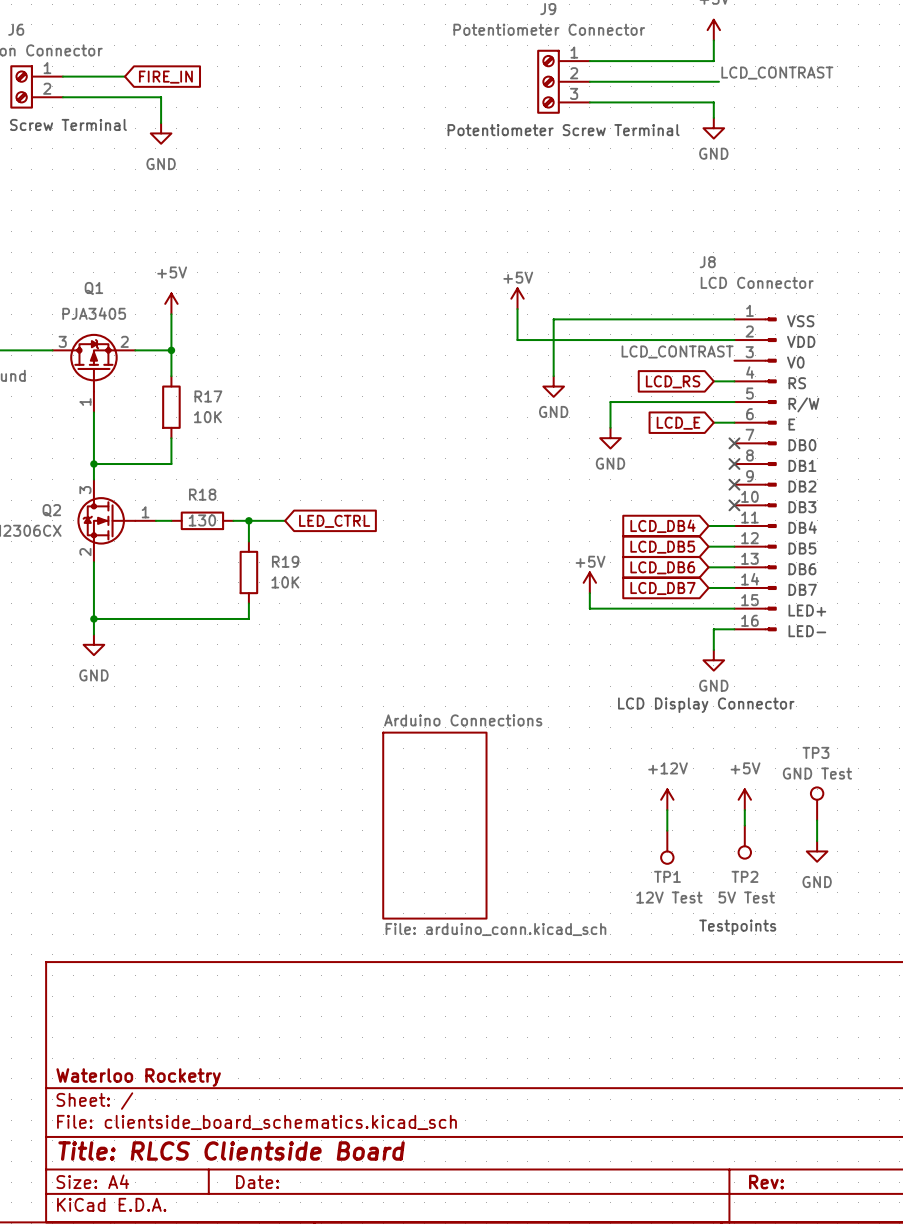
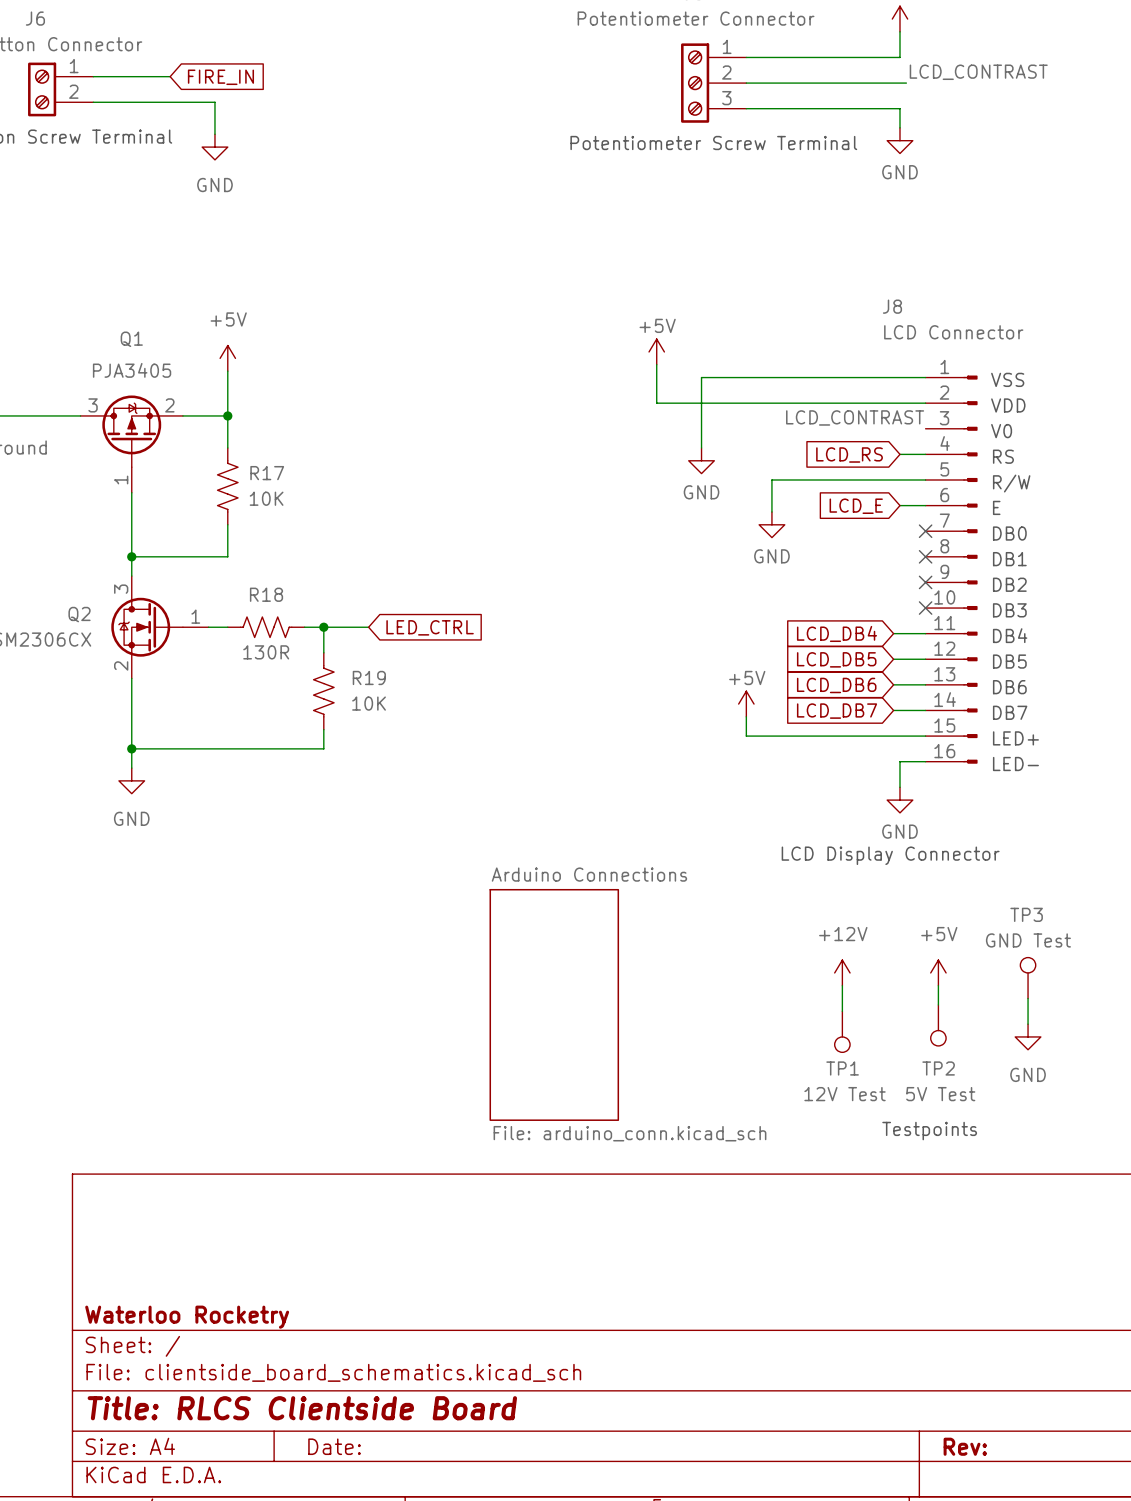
R17 symbol: [162, 376, 181, 439] -> [217, 447, 239, 525]
R18 symbol: [171, 511, 234, 531] -> [227, 617, 305, 638]
R18 value: 130 (202, 520) -> 130R (266, 652)
R19 symbol: [239, 541, 259, 604] -> [313, 652, 335, 730]

